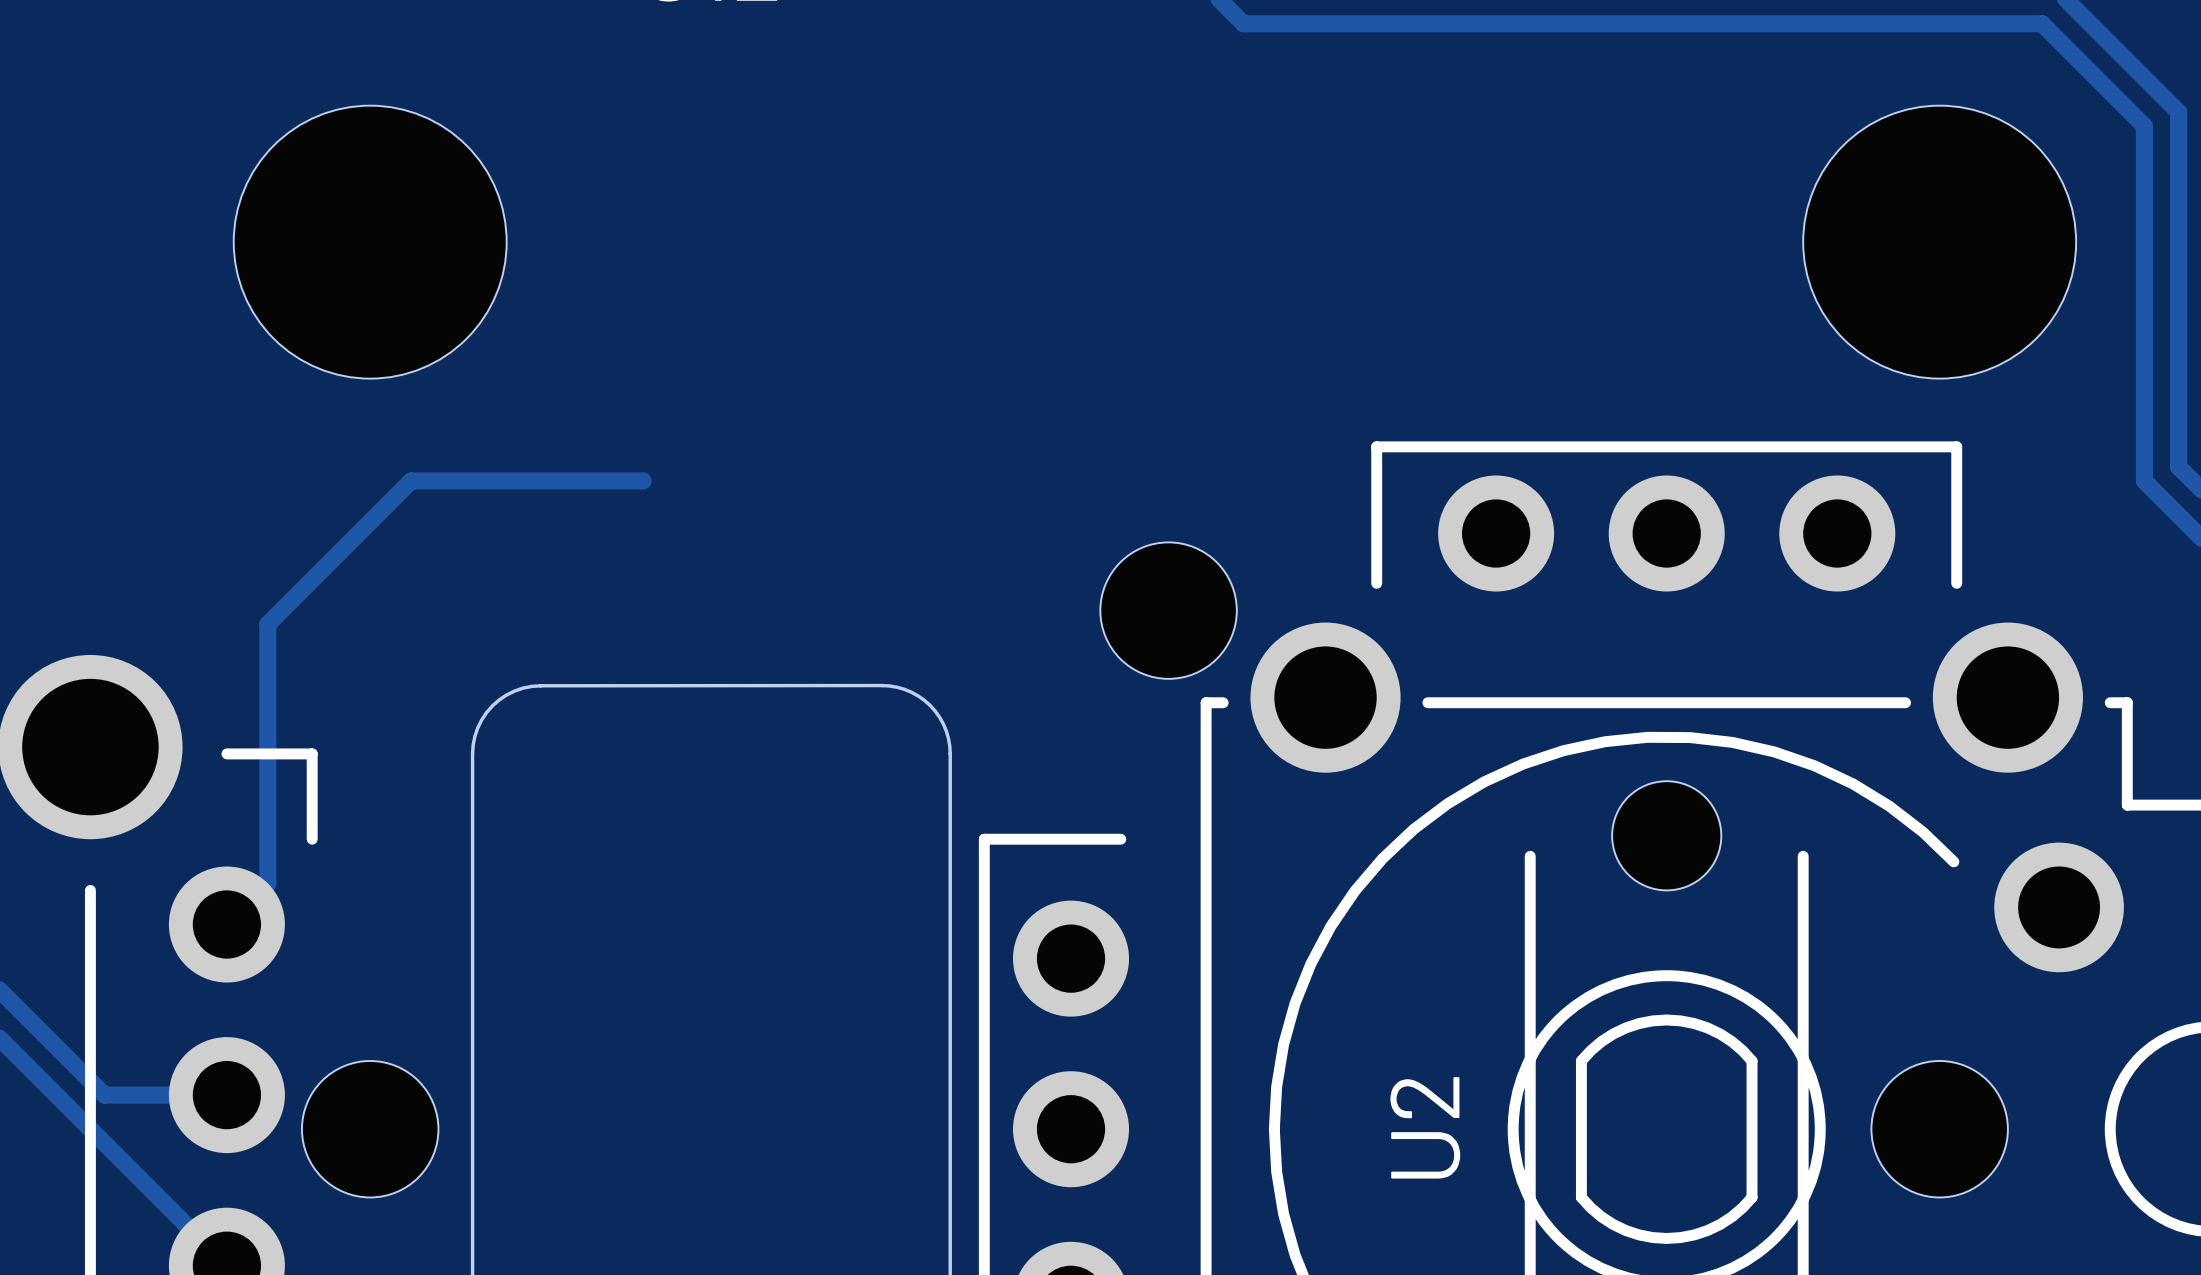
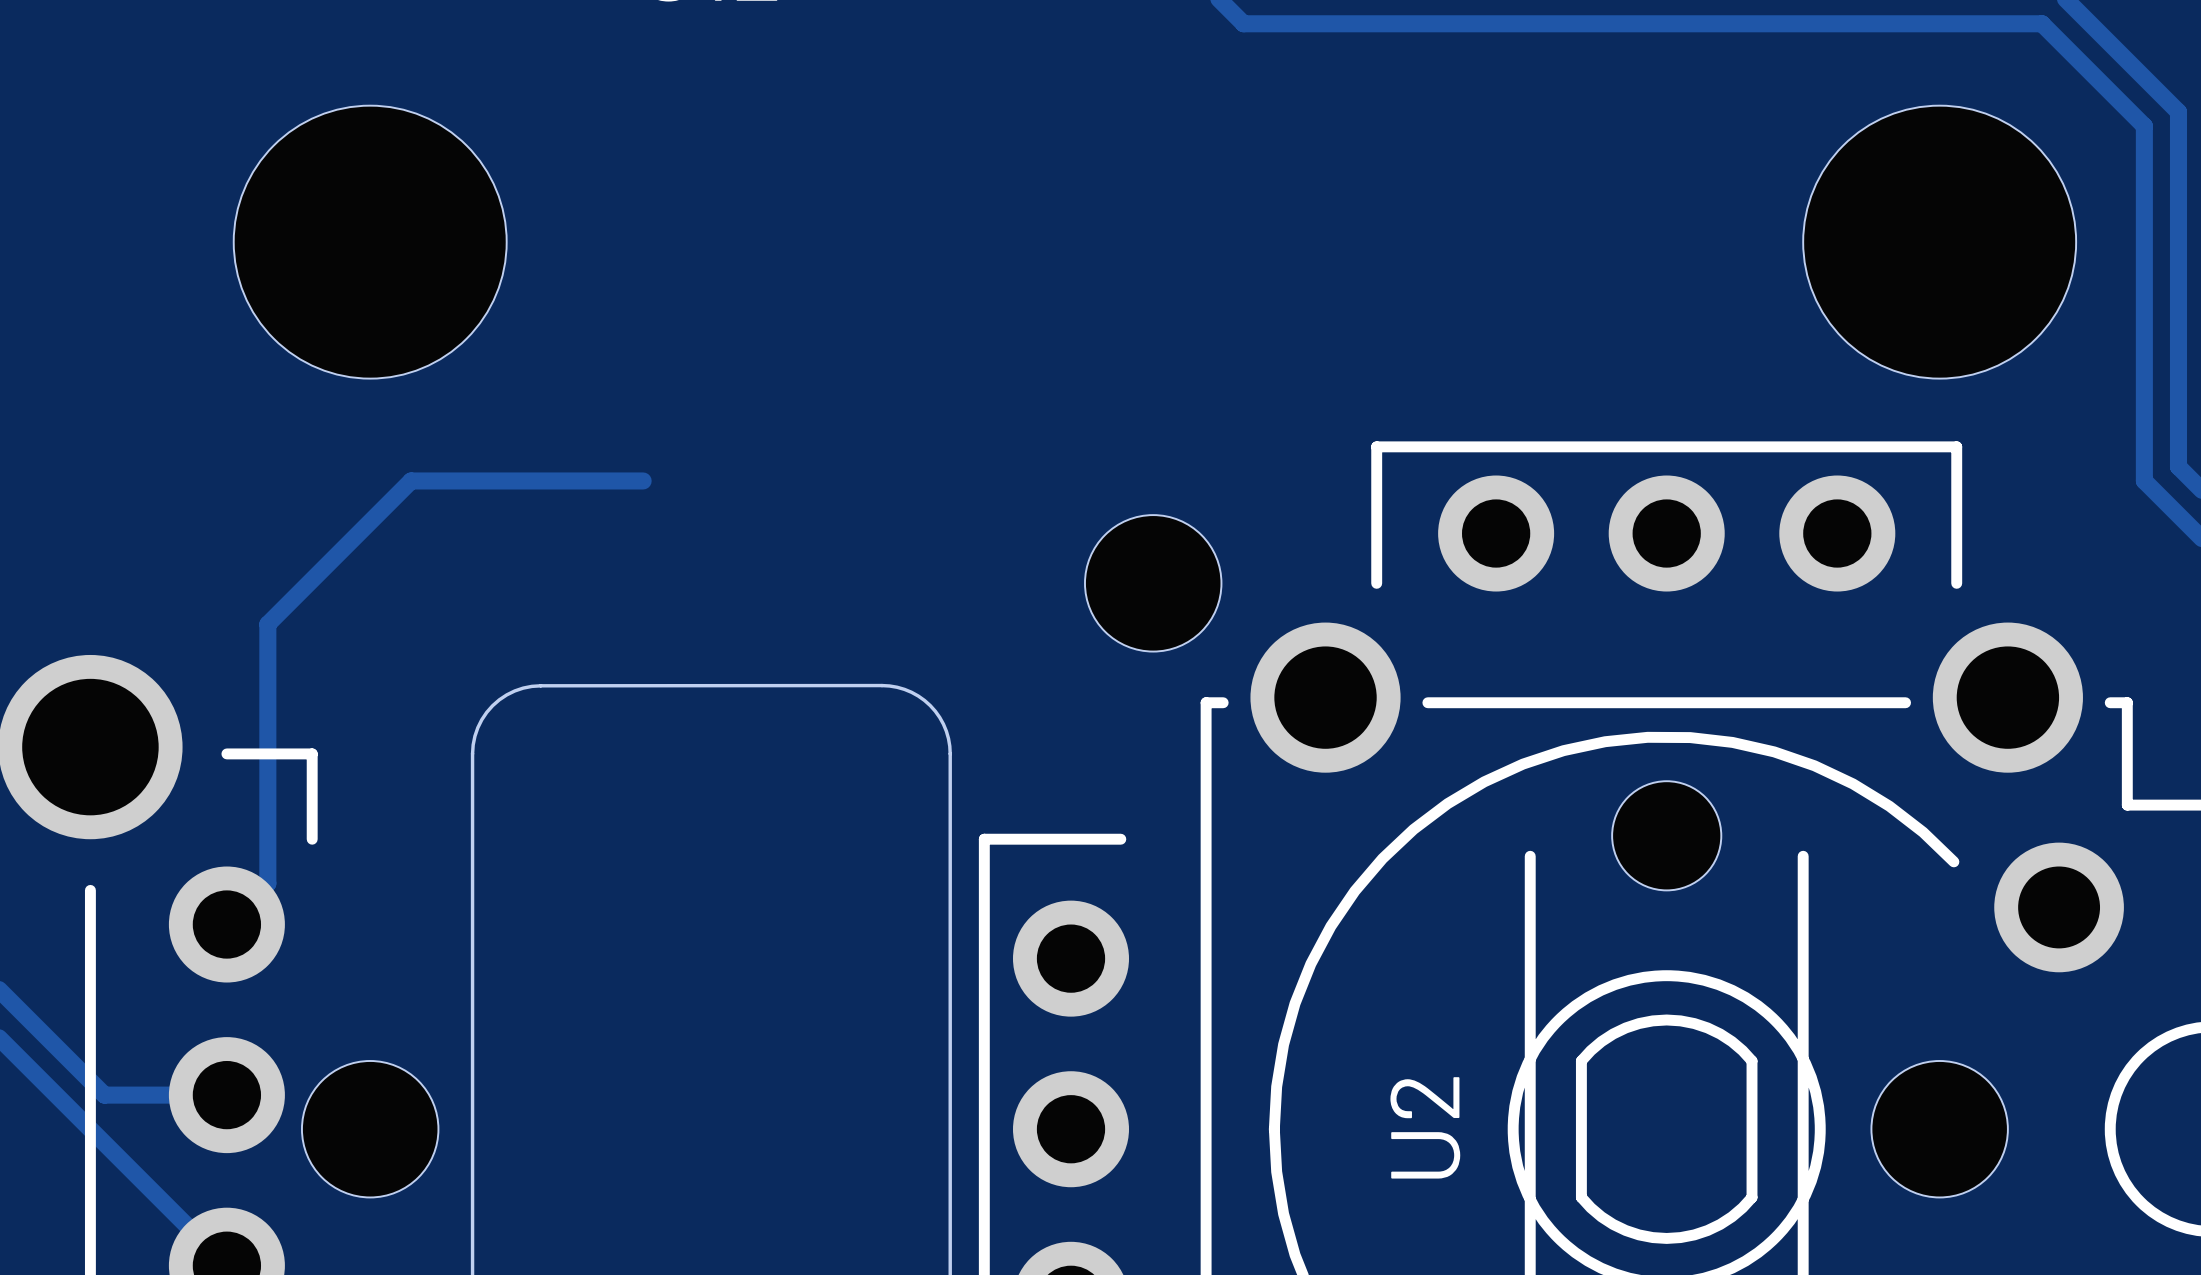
part position: (1168, 610) -> (1153, 583)

